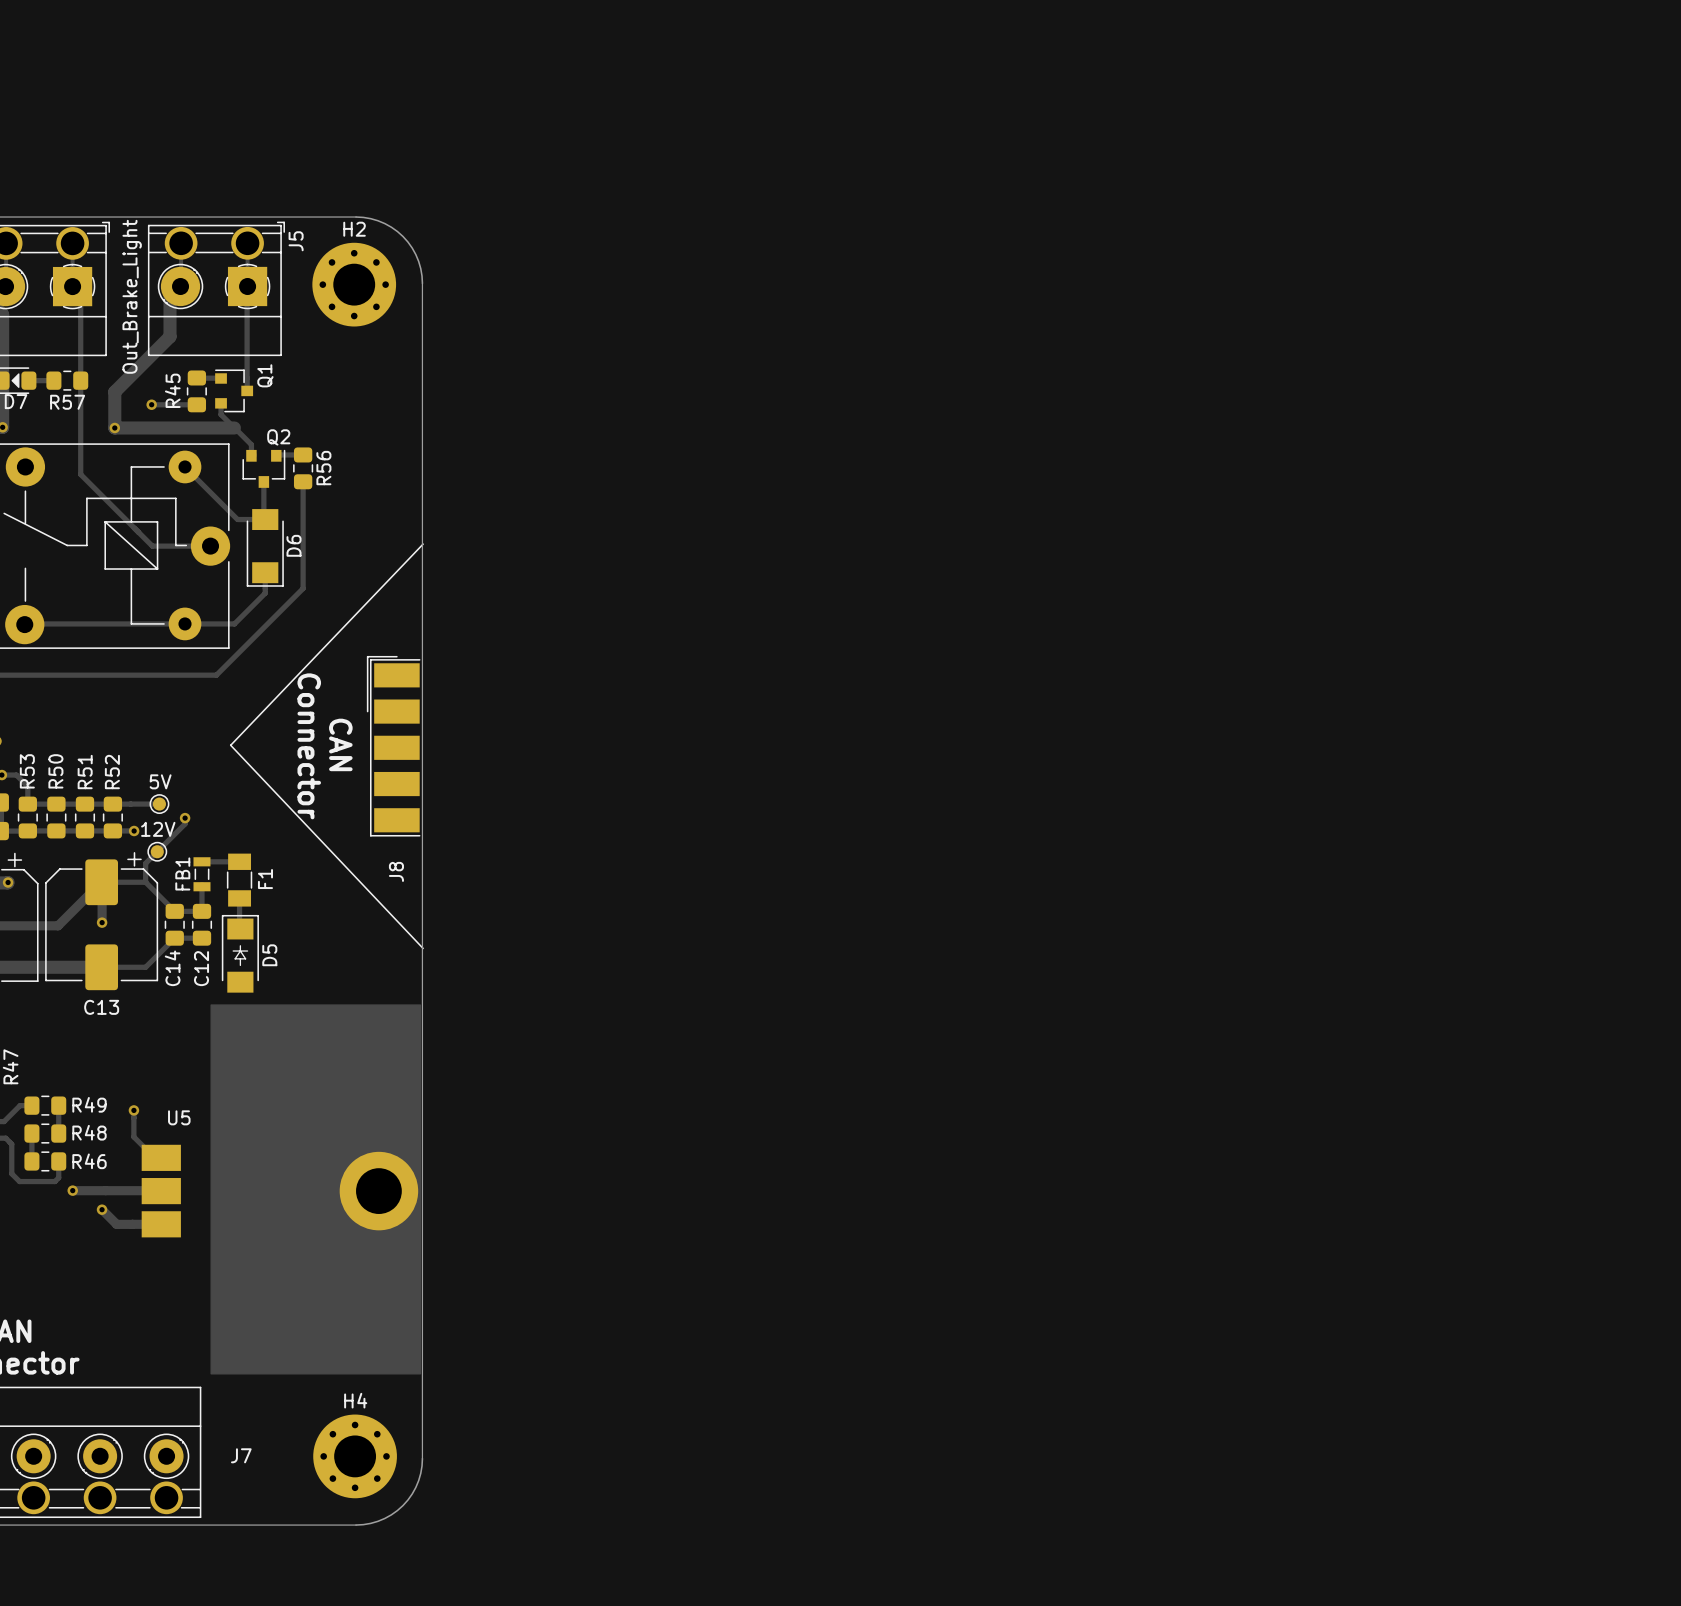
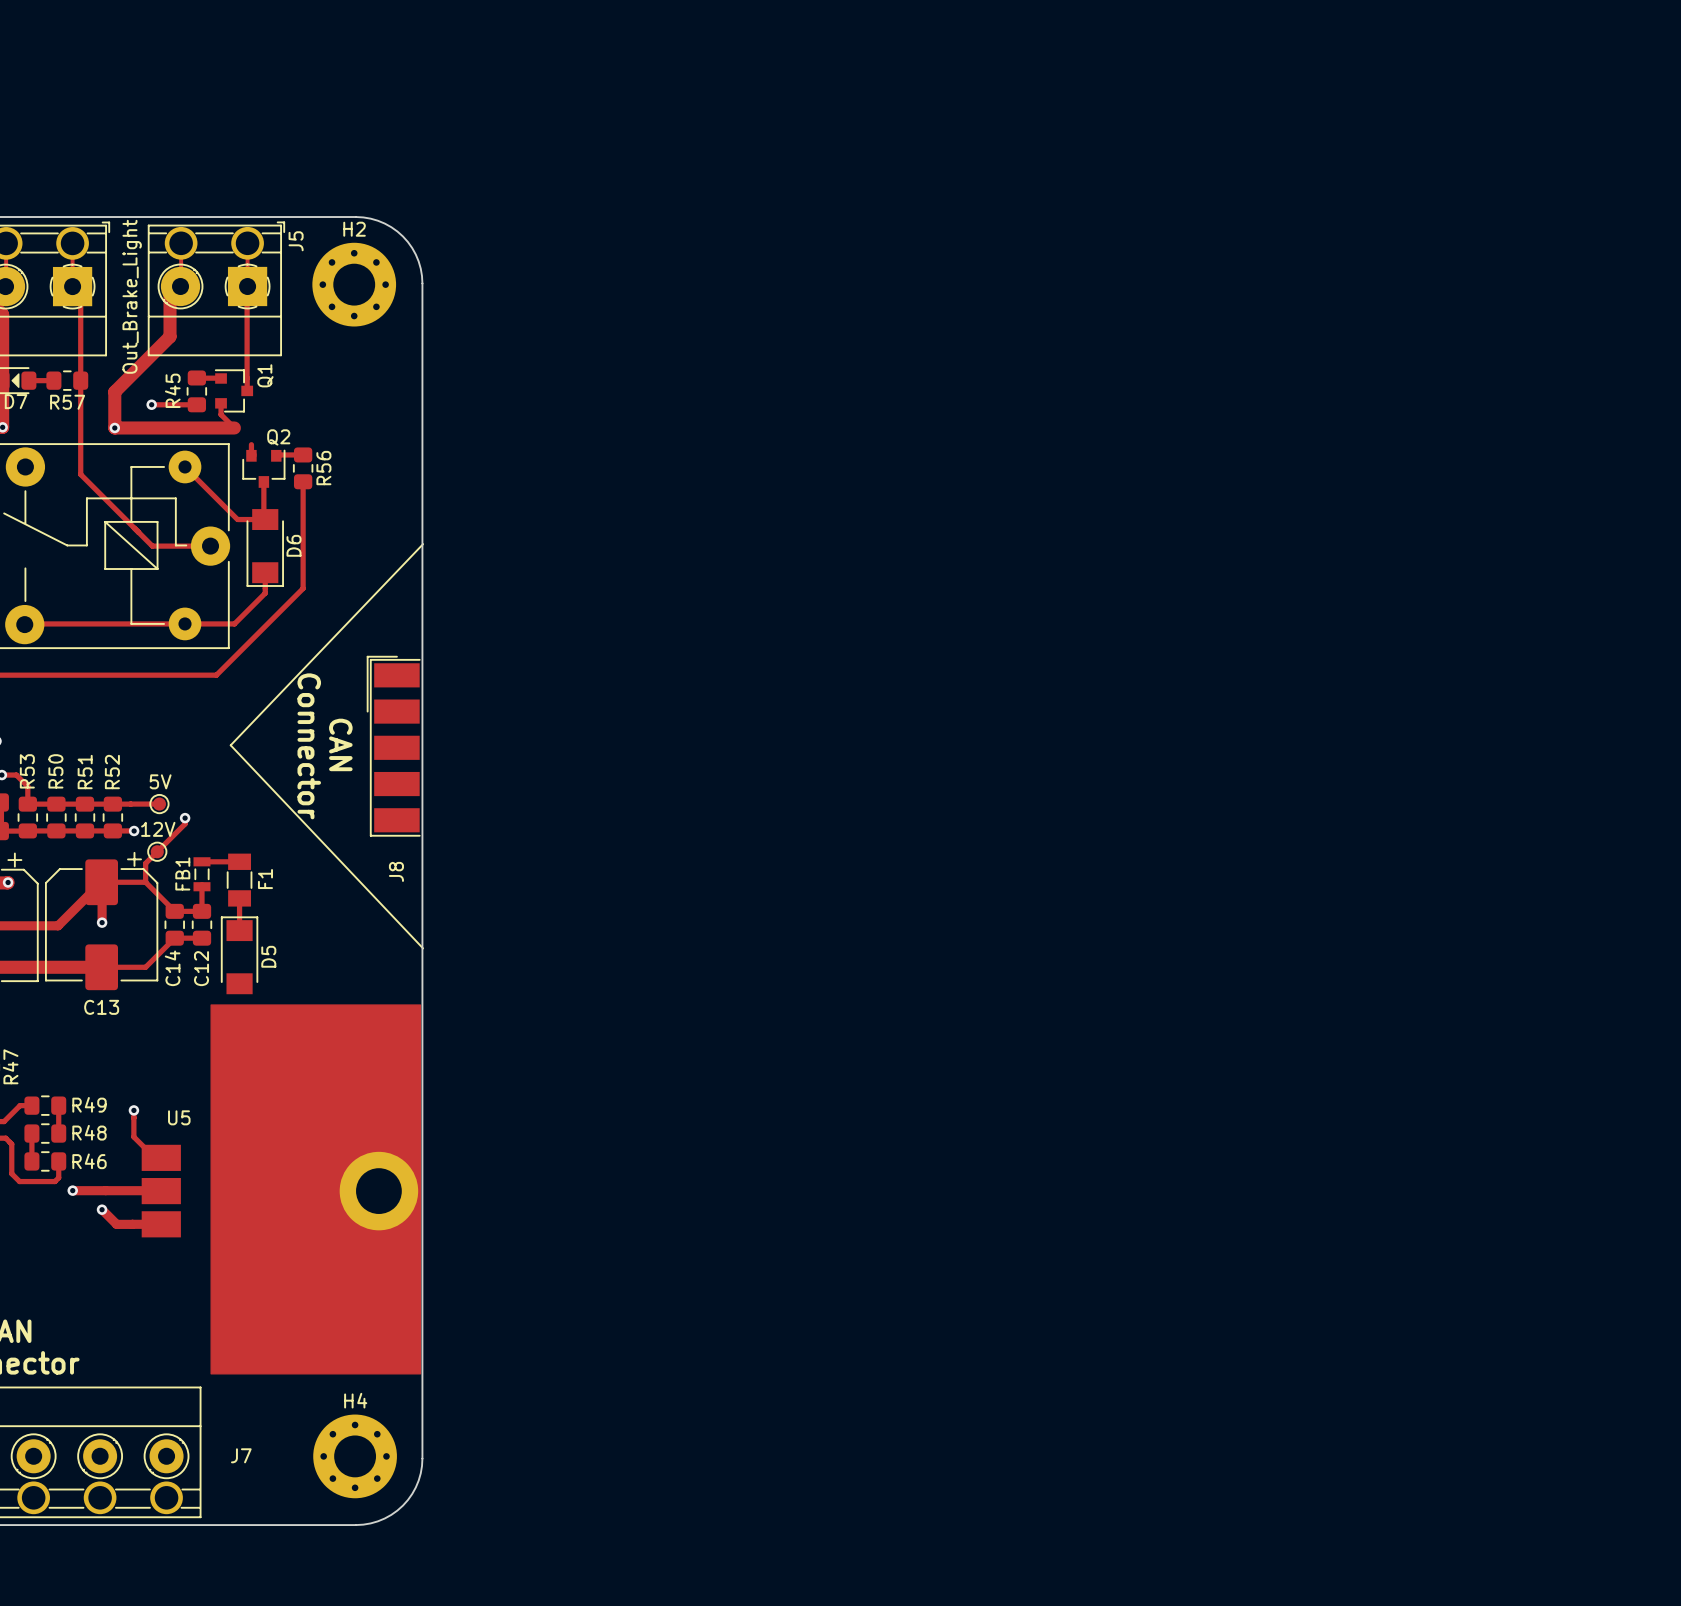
track: (234, 427) (251, 444) -> none
D5 footprint: [221, 914, 259, 993] -> [220, 916, 259, 995]

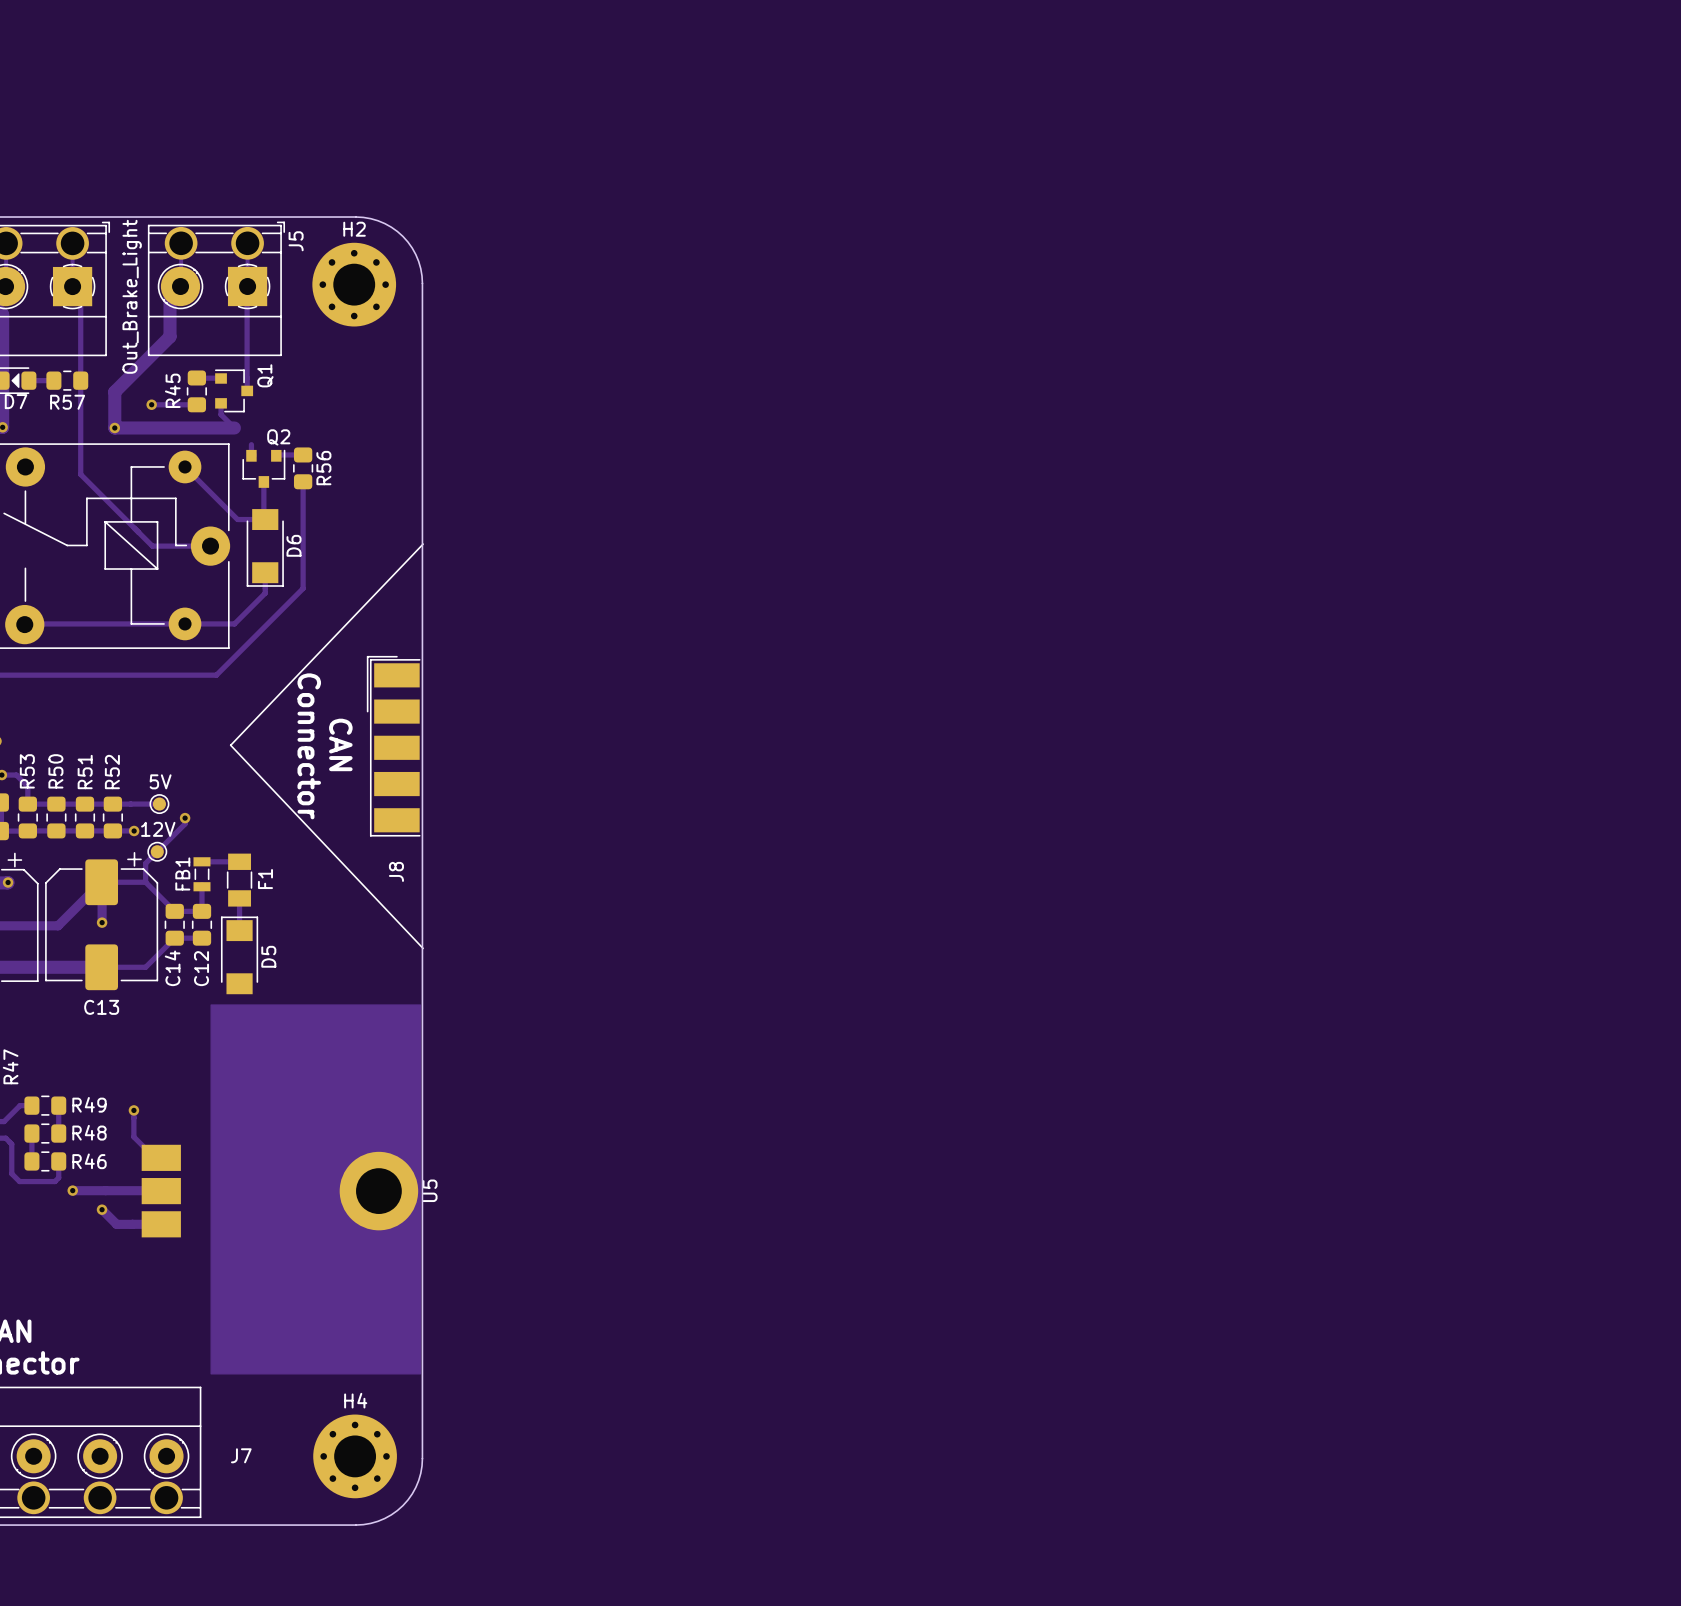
U5 name rotation: 0° (179, 1117) -> 90° counterclockwise (430, 1190)
U5 name position: U5 (179, 1117) -> U5 (430, 1190)

